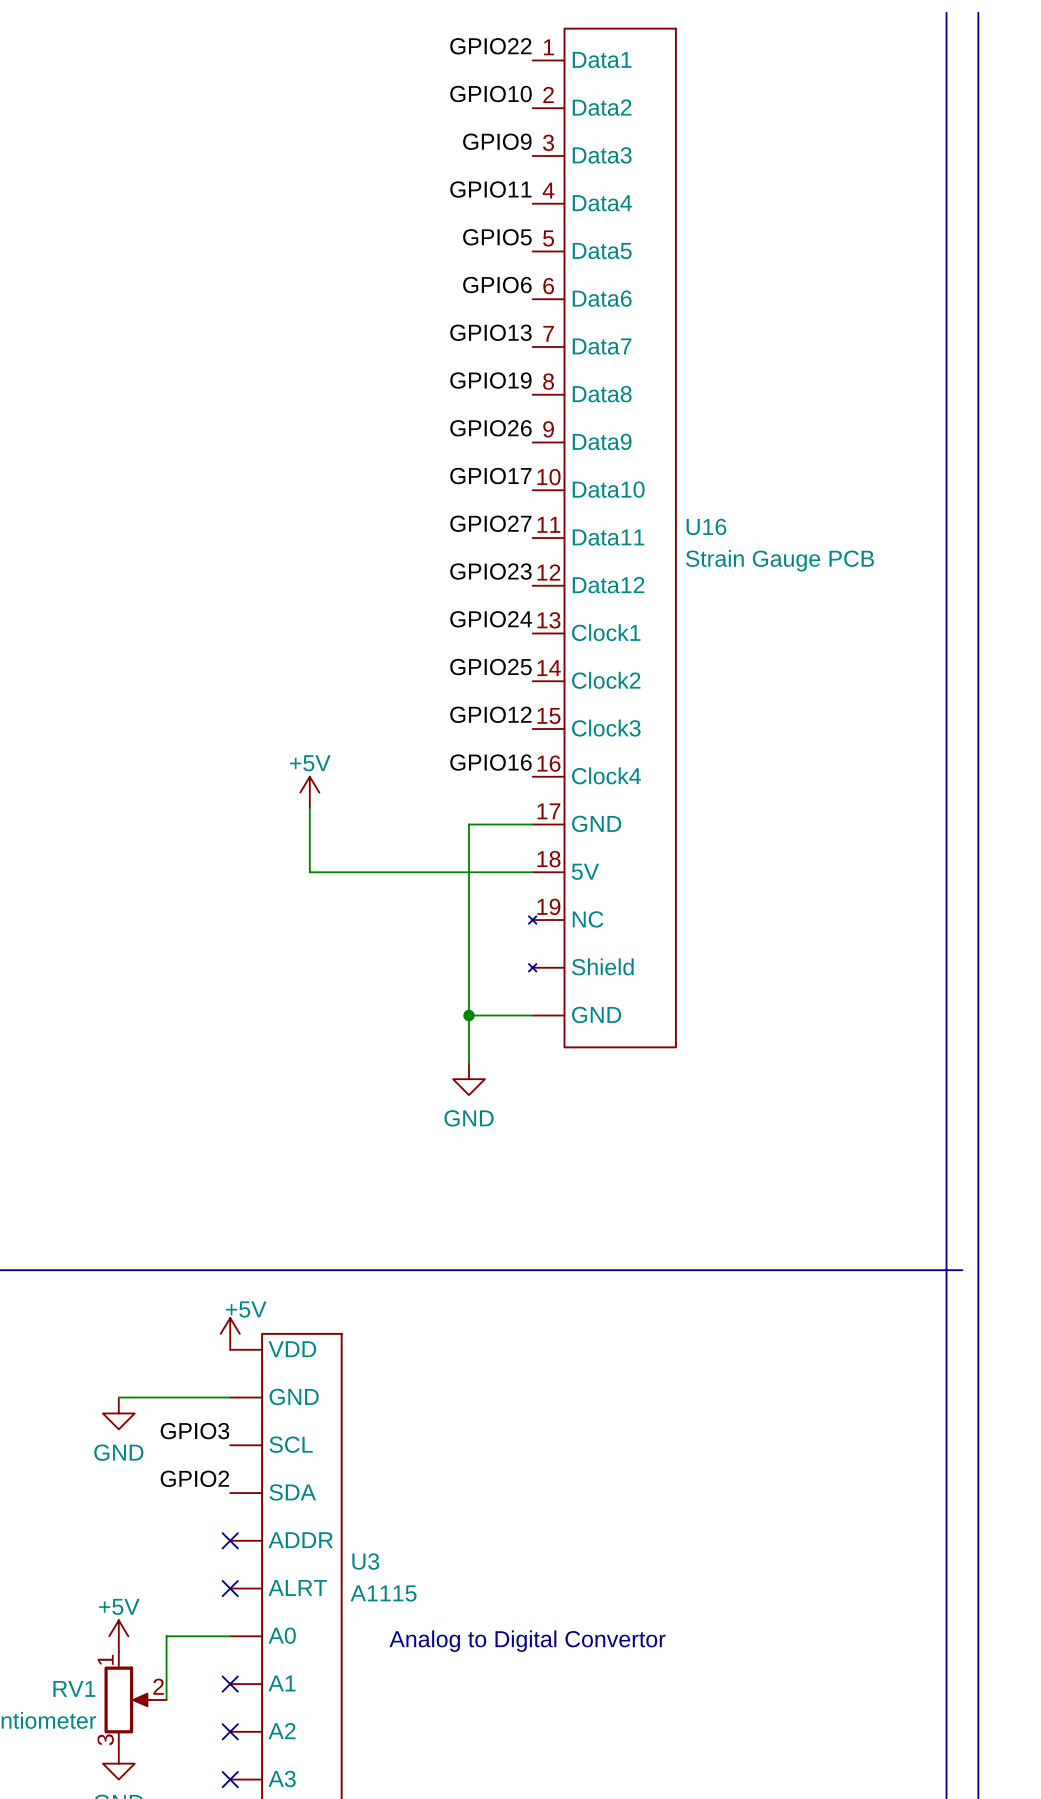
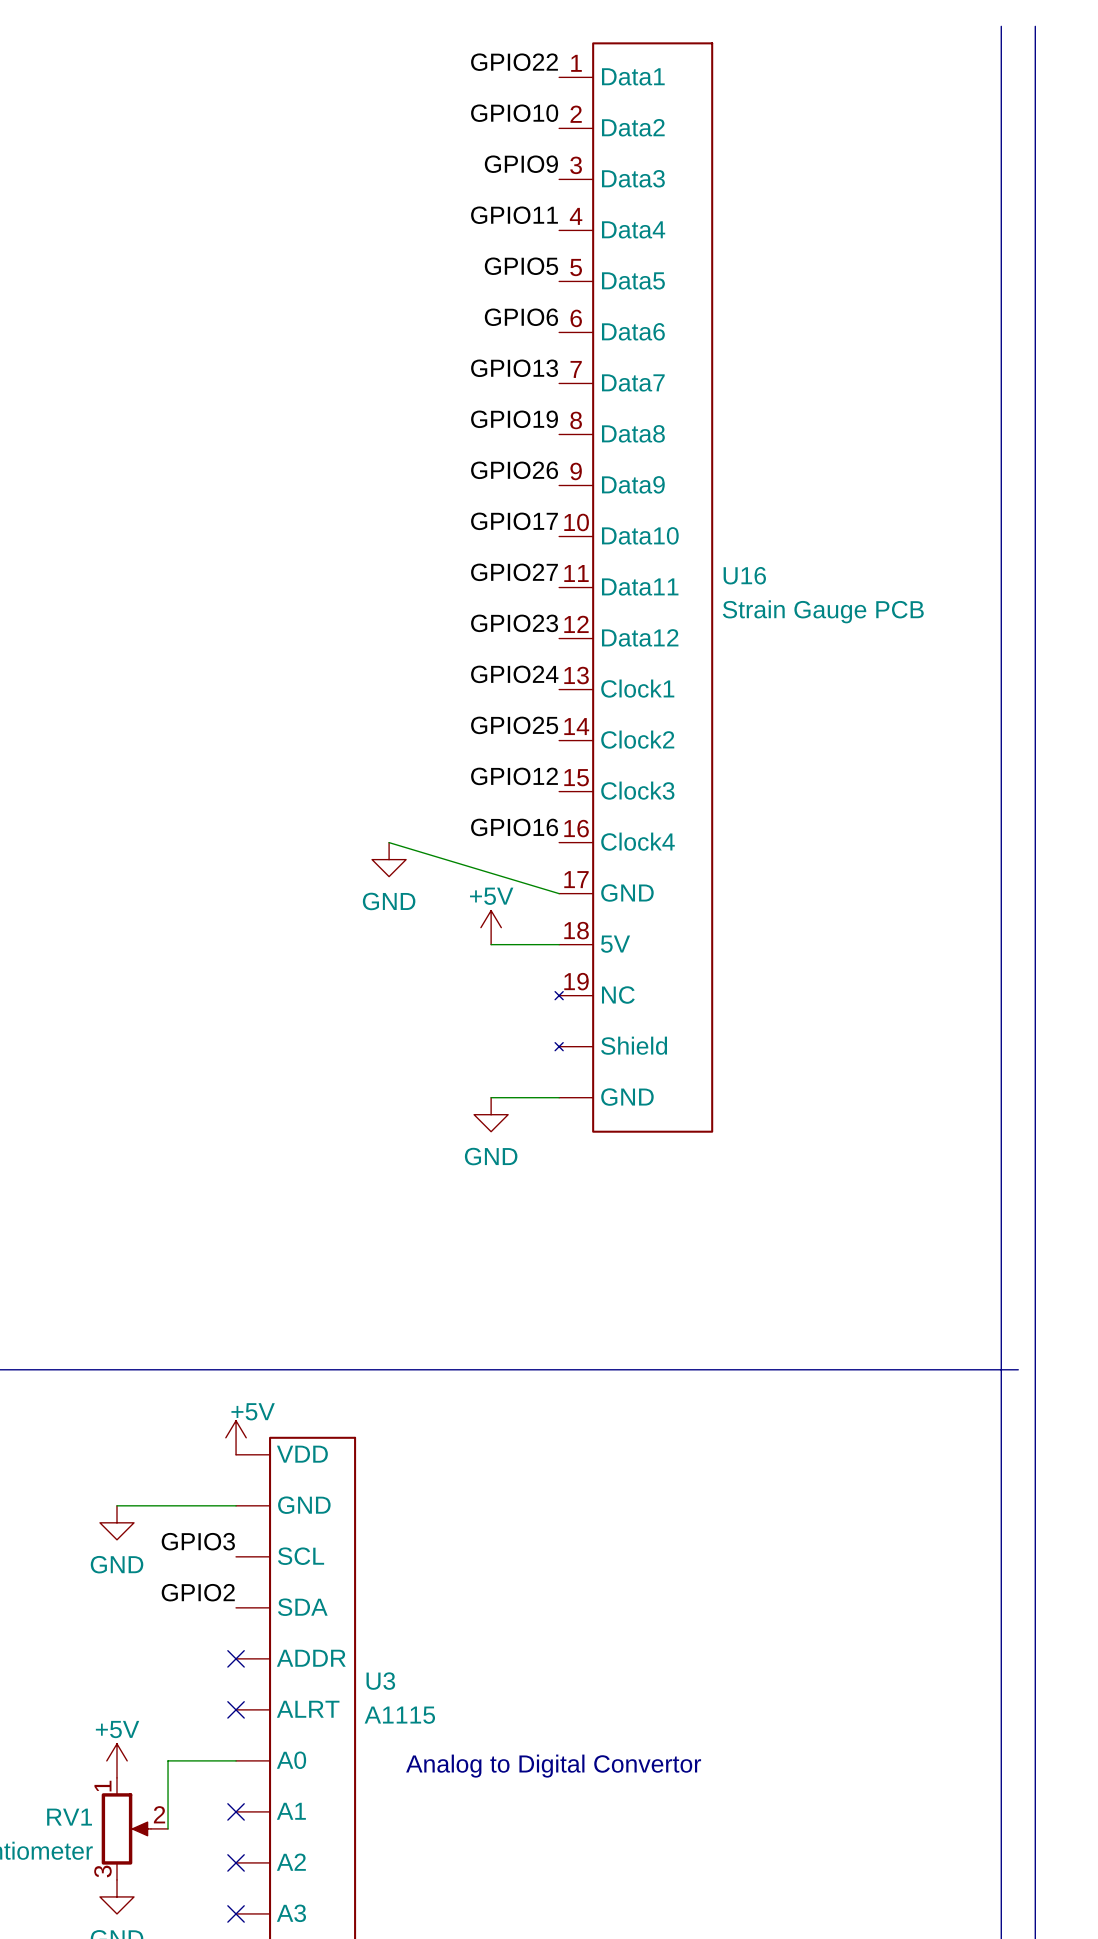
power symbol position: +5V (309, 792) -> +5V (491, 927)
power symbol: none -> GND (389, 859)
wire: (309, 808) (309, 872) (468, 872) -> none
wire: (532, 824) (468, 824) (468, 1063) -> (559, 893) (389, 842)
junction: (468, 1015) -> none
power symbol position: GND (468, 1079) -> GND (491, 1114)

